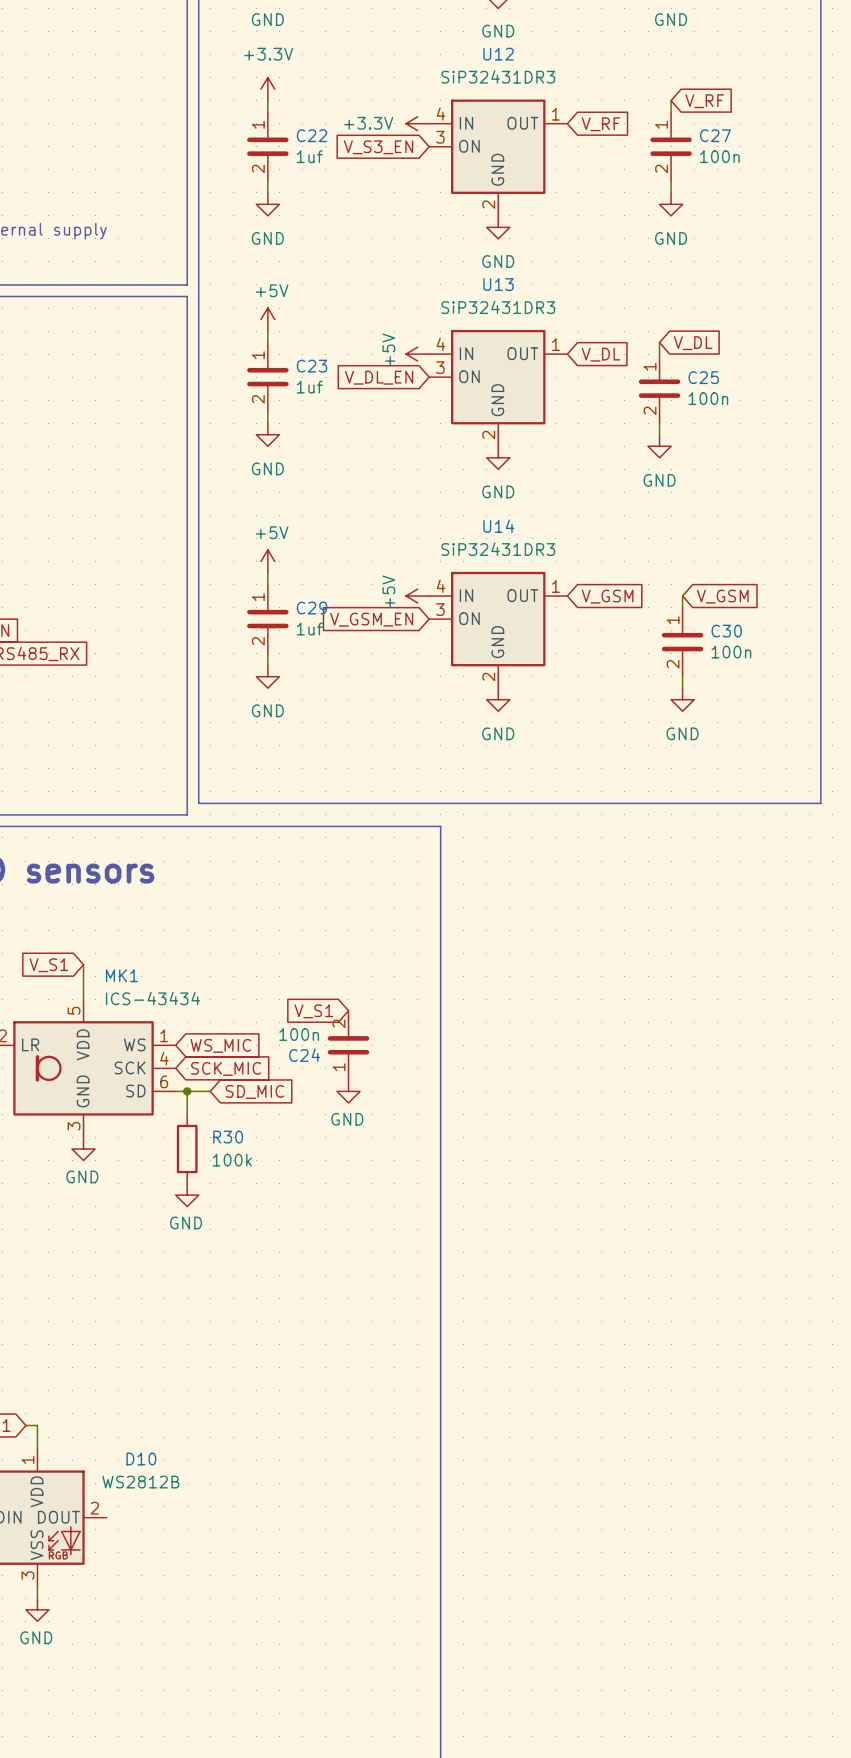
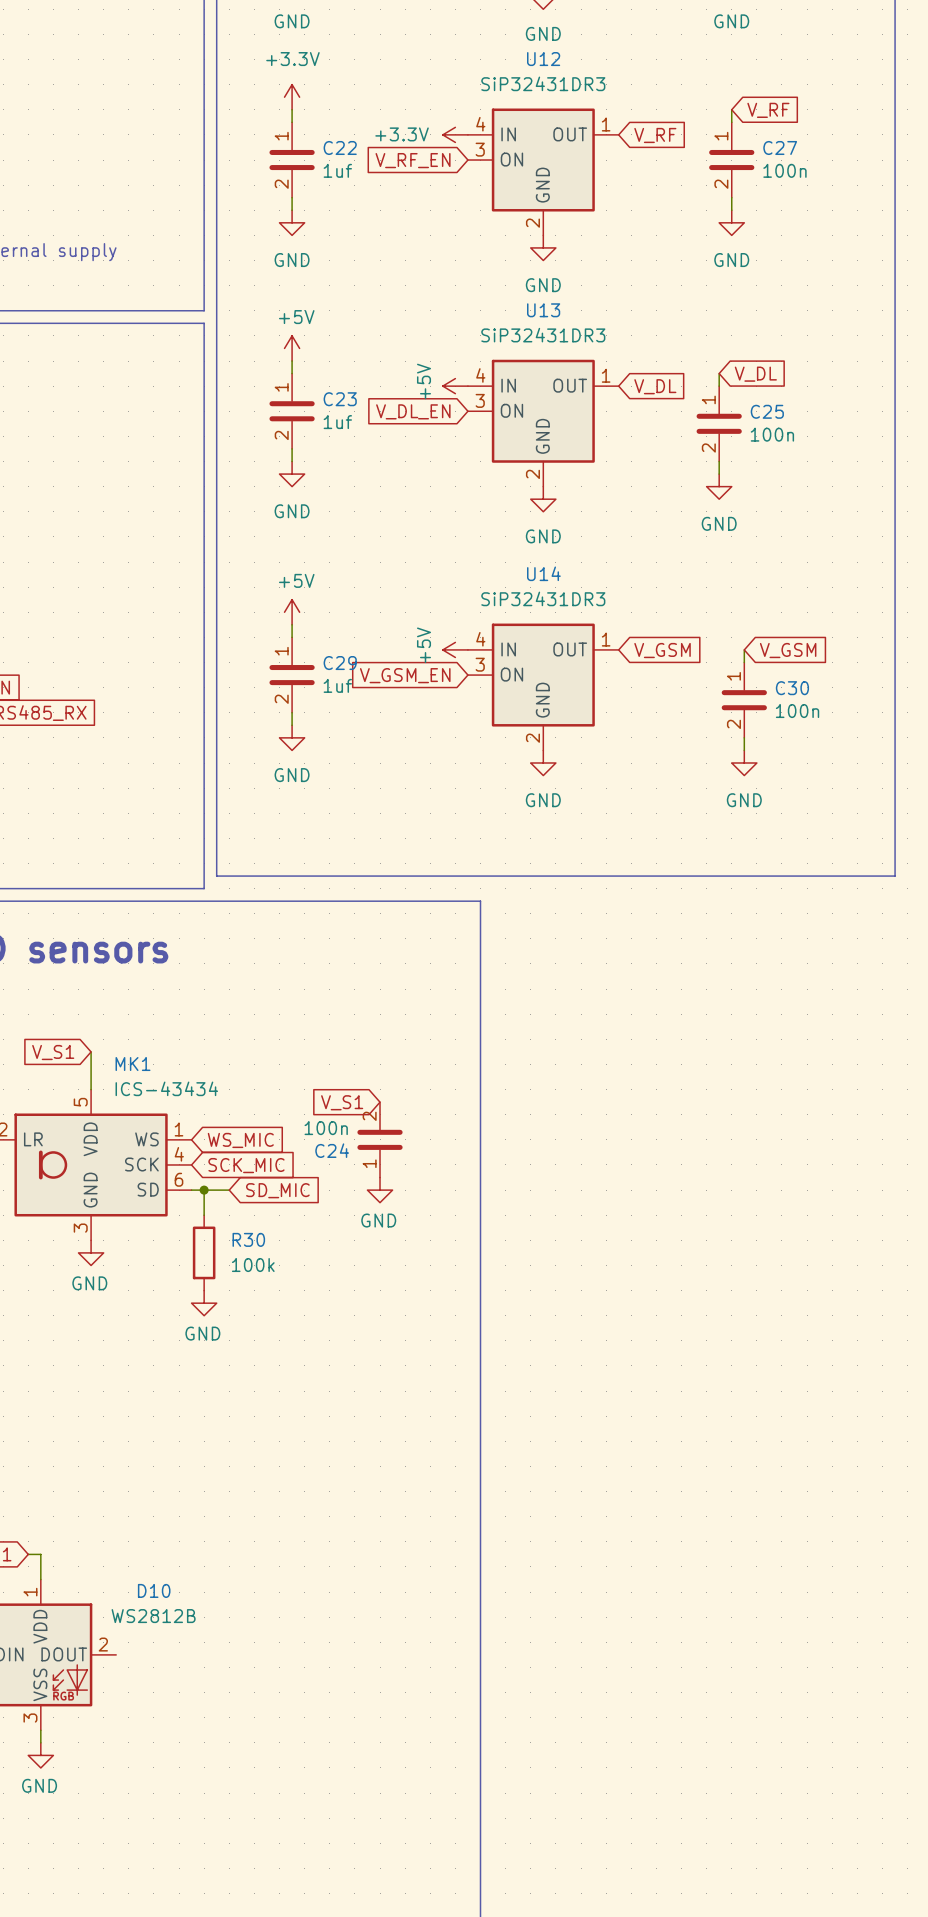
global label: V_S3_EN (378, 147) -> V_RF_EN (413, 160)

